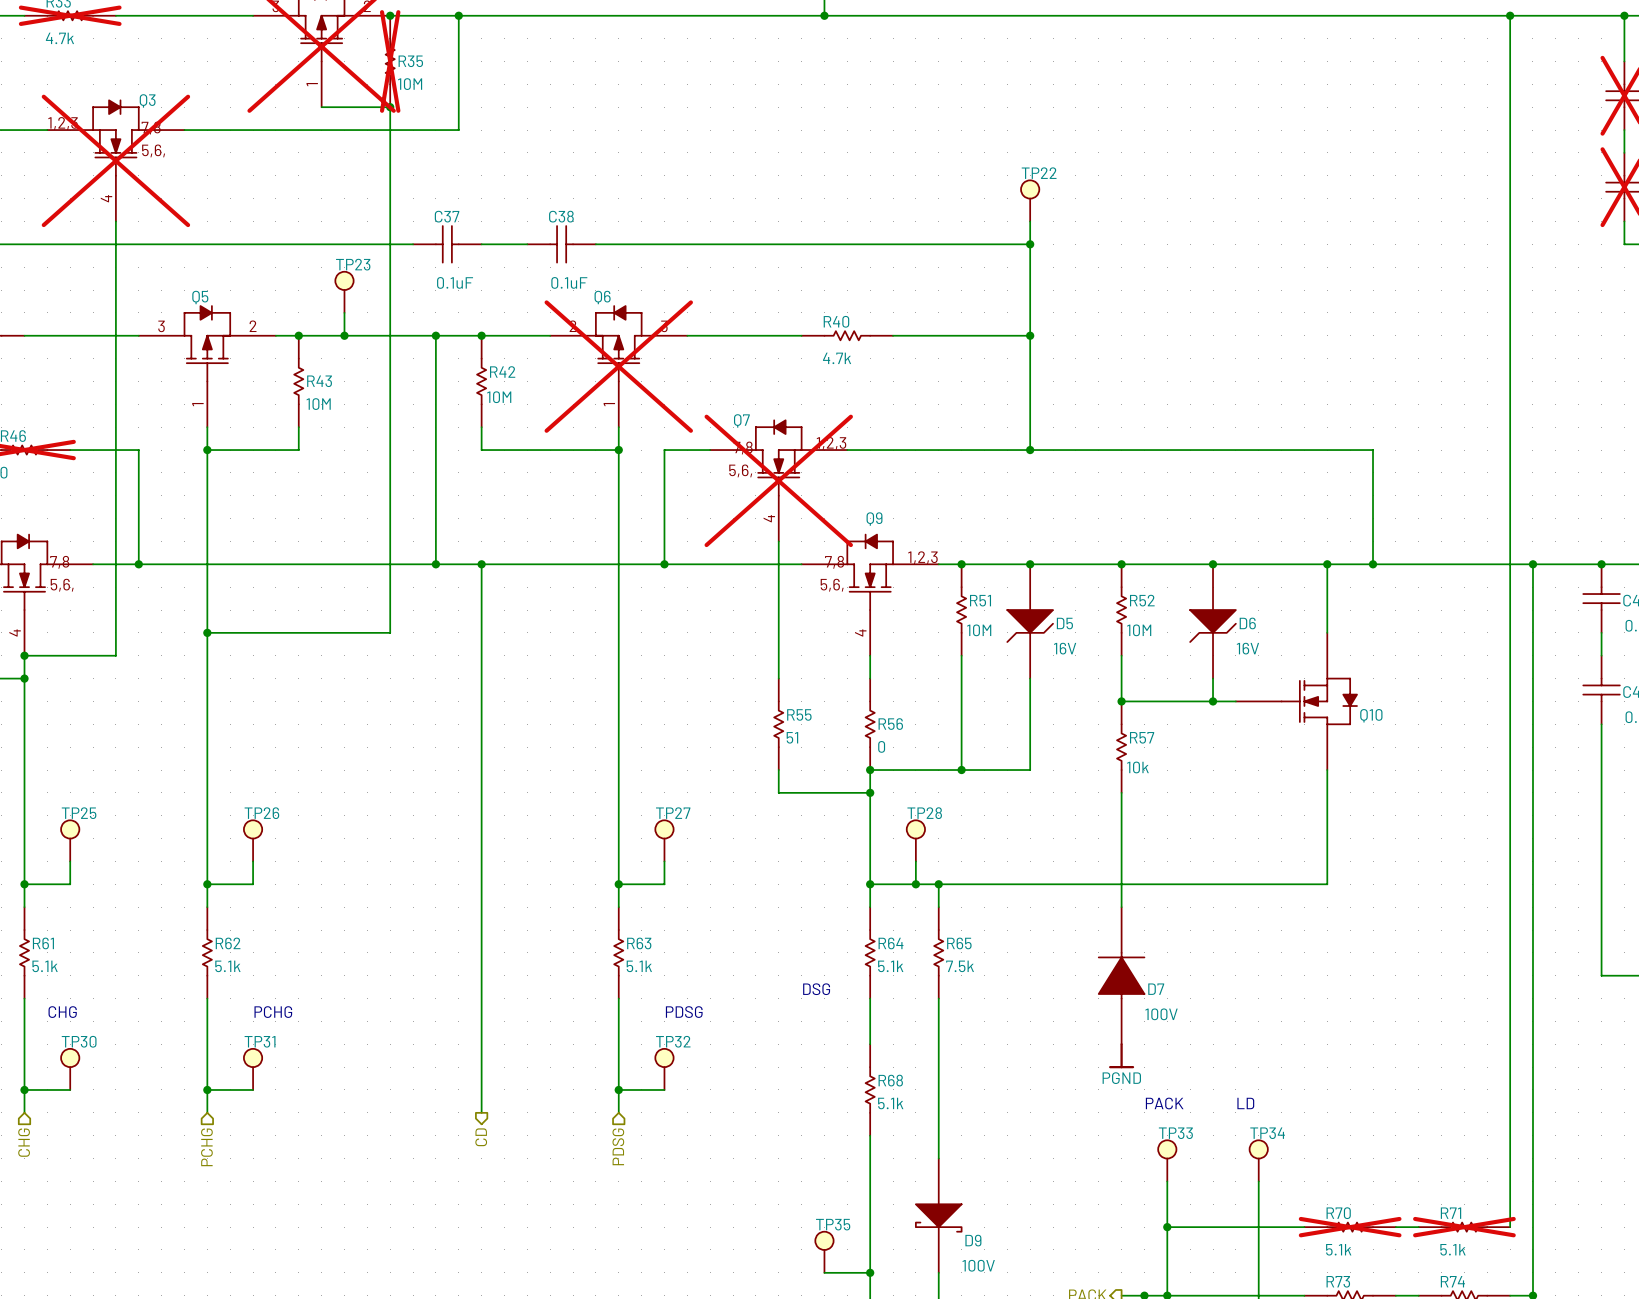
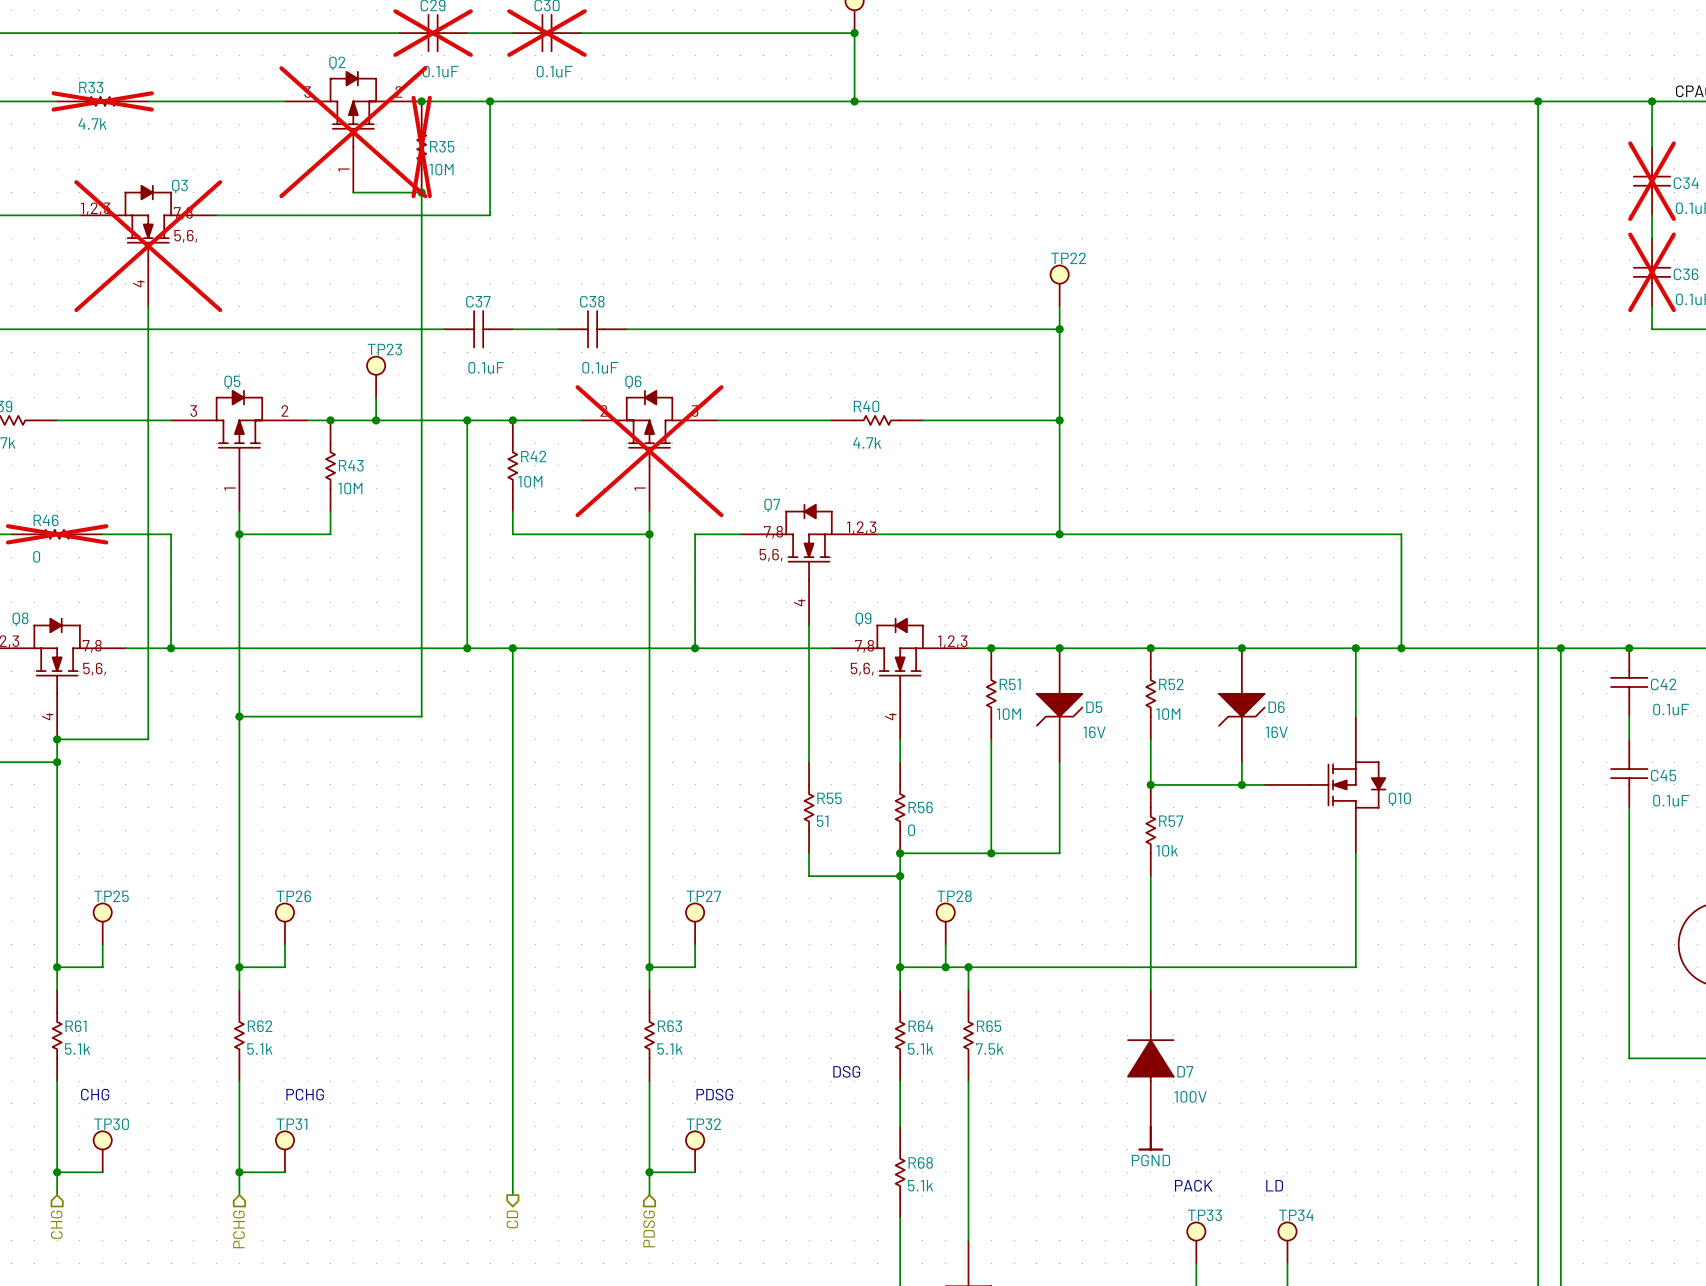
Q7 do-not-place cross: (778, 480) -> none
Q9 name position: Q9 (874, 519) -> Q9 (863, 619)

